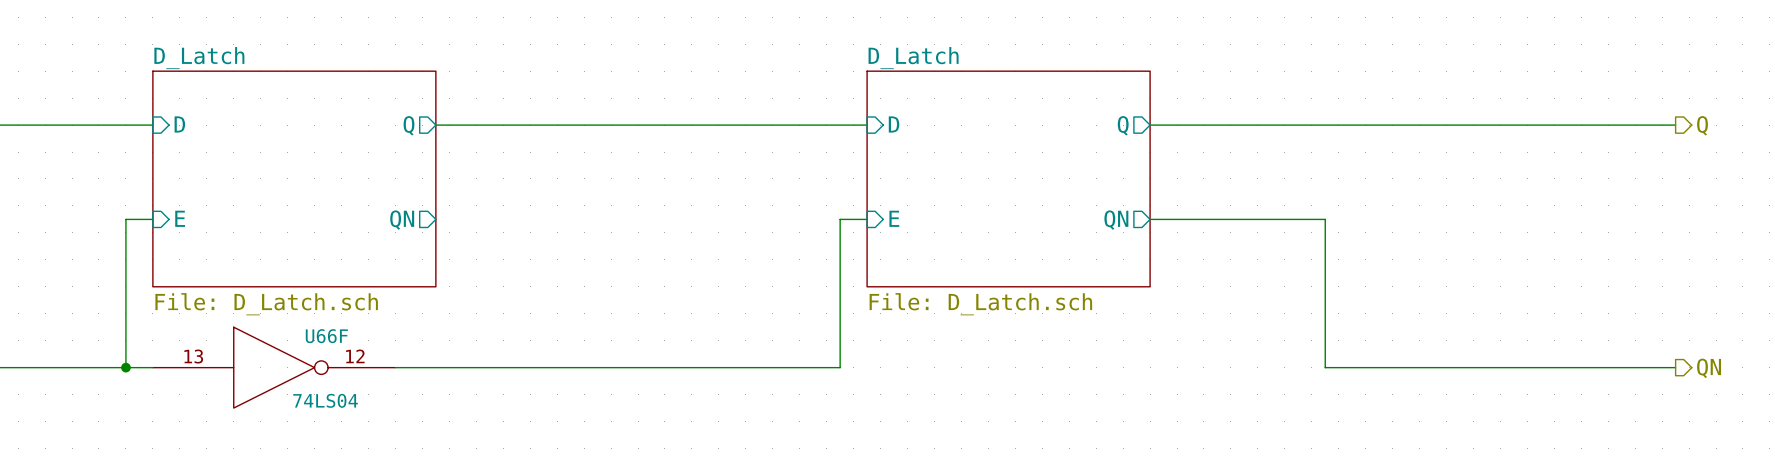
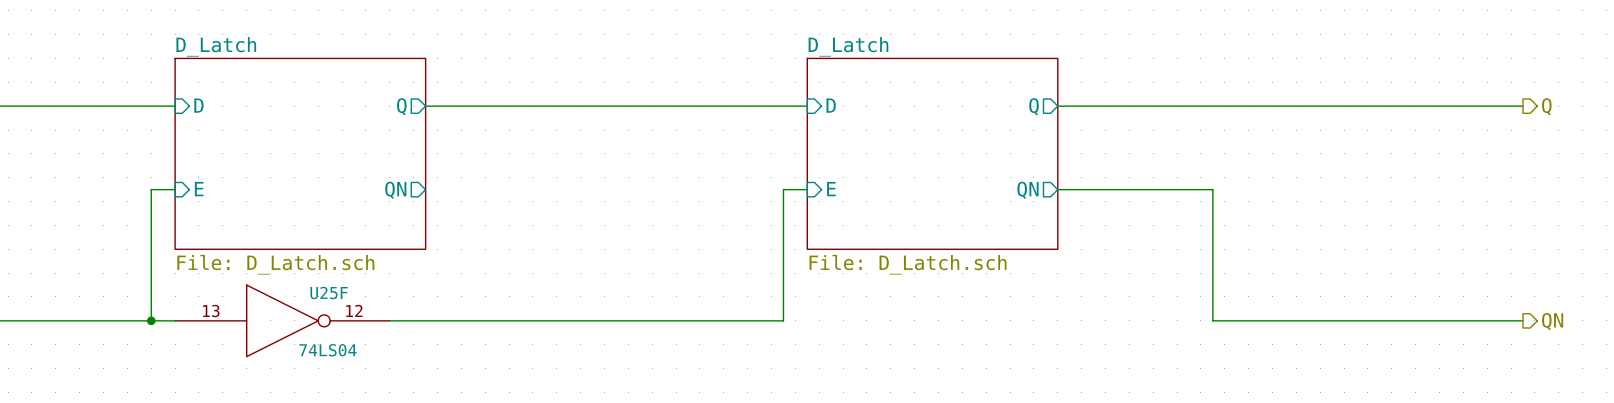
U66F name: U66F (326, 336) -> U25F (329, 292)

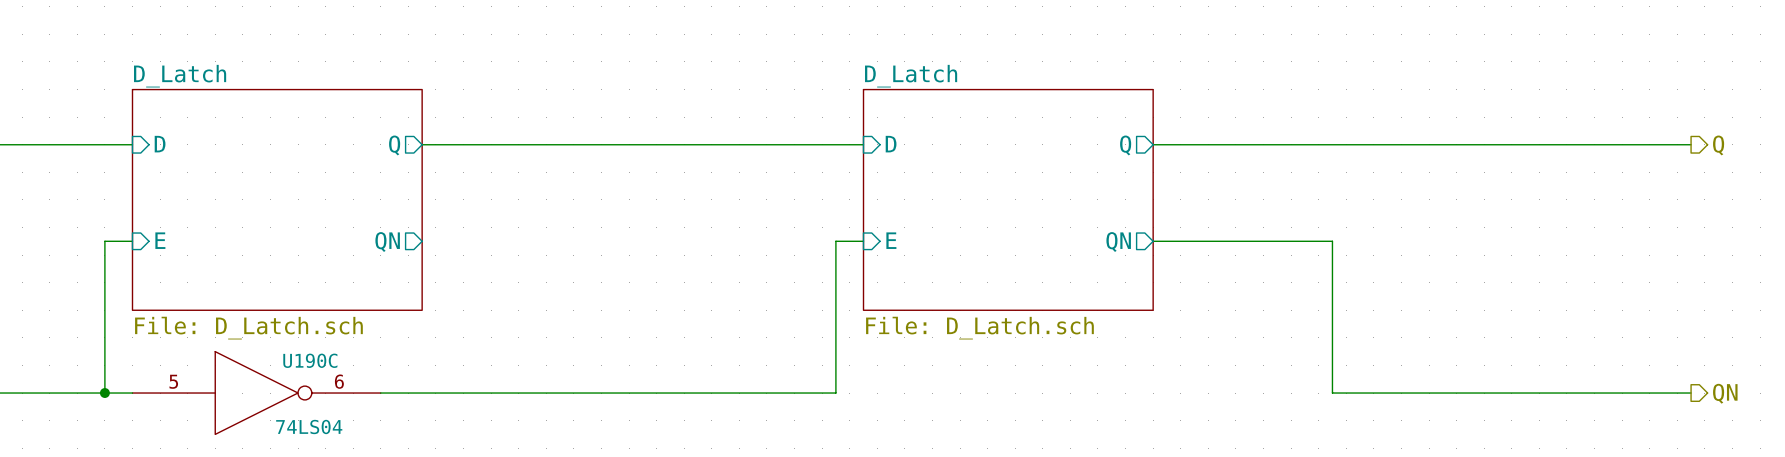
U25F name: U25F (329, 292) -> U190C (310, 360)
U25F pin number: 12 (354, 310) -> 6 (339, 381)
U25F pin number: 13 (211, 311) -> 5 (173, 381)

